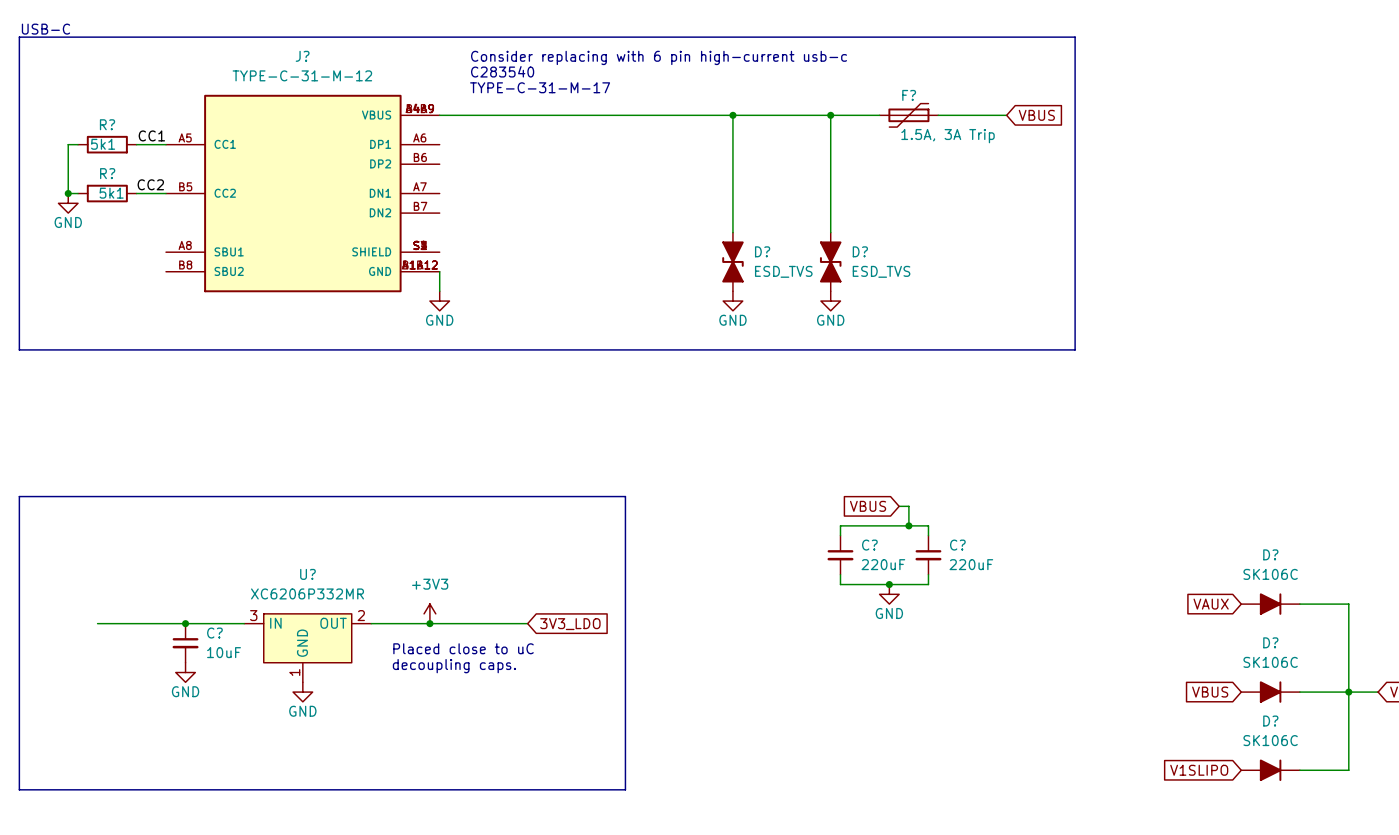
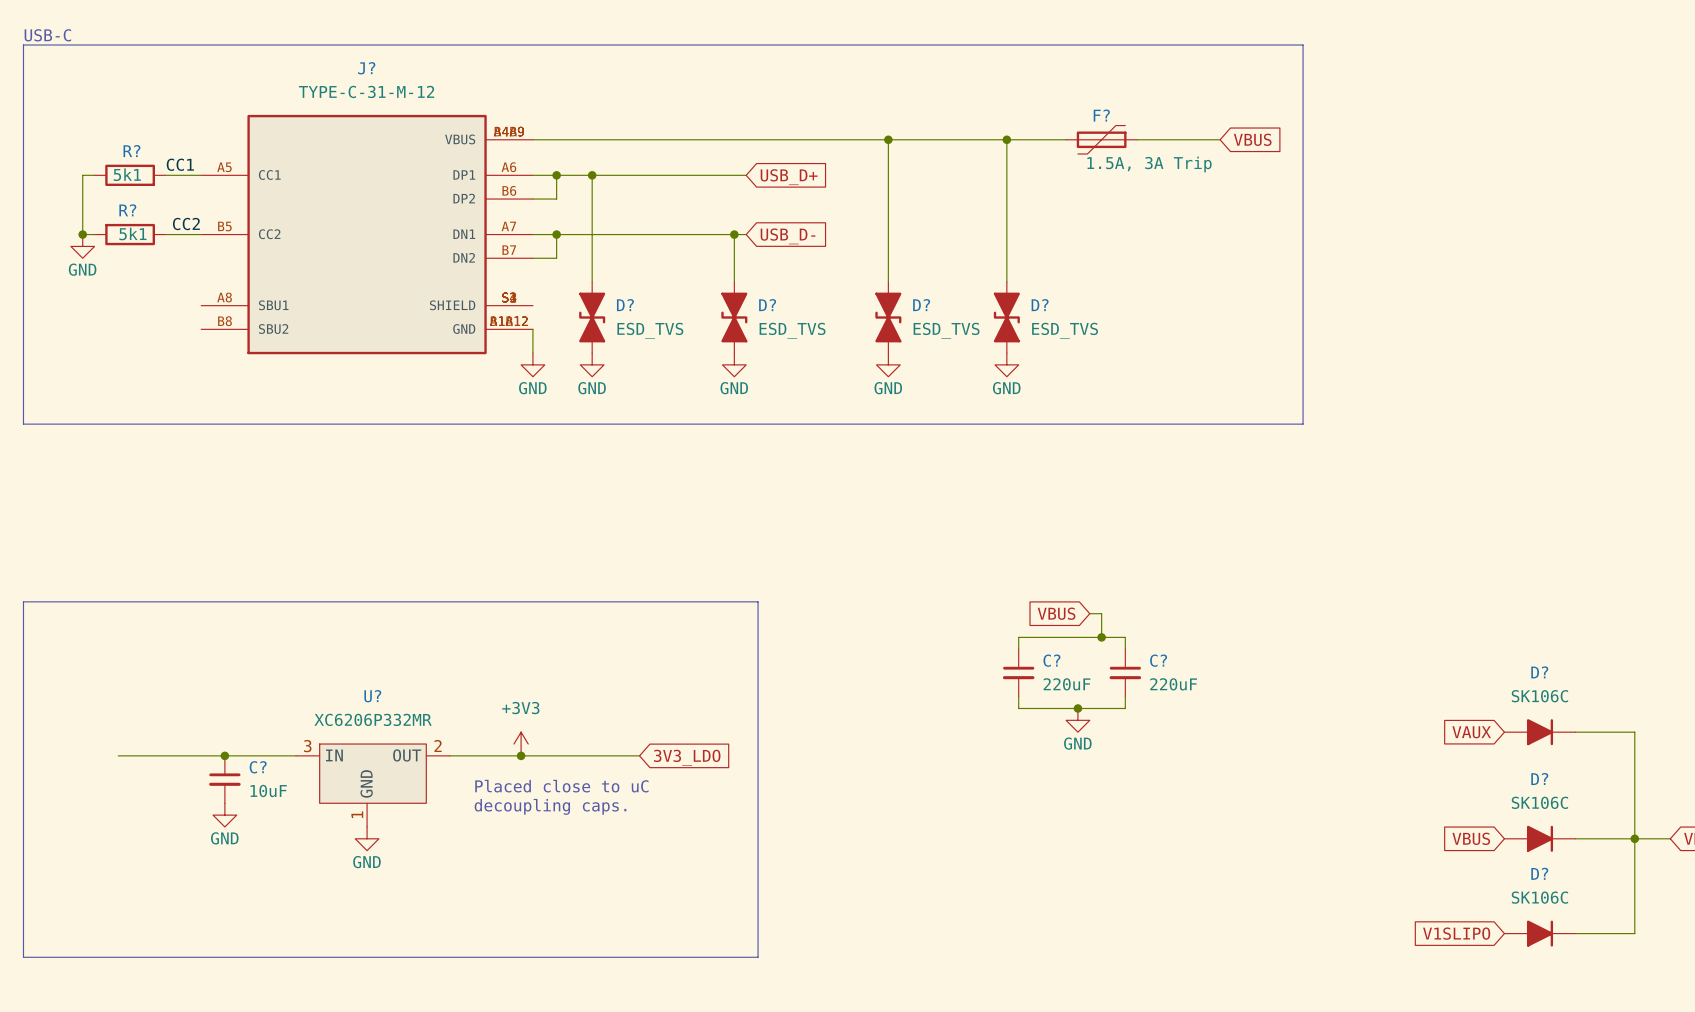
text: Consider replacing with 6 pin high-current usb-c (659, 57) -> none
text: C283540 (502, 71) -> none
text: TYPE-C-31-M-17 (540, 87) -> none
wire: none -> (532, 175) (746, 175)
wire: none -> (556, 175) (556, 199) (532, 199)
junction: none -> (556, 175)
wire: none -> (592, 175) (592, 281)
junction: none -> (592, 175)
global label: none -> USB_D+ (789, 177)
wire: none -> (532, 234) (746, 234)
wire: none -> (556, 234) (556, 258) (532, 258)
junction: none -> (556, 234)
wire: none -> (734, 234) (734, 281)
junction: none -> (734, 234)
global label: none -> USB_D- (788, 236)
D?: none -> ESD_TVS (592, 317)
D?: none -> ESD_TVS (734, 317)
power symbol: none -> GND (592, 364)
power symbol: none -> GND (734, 364)

